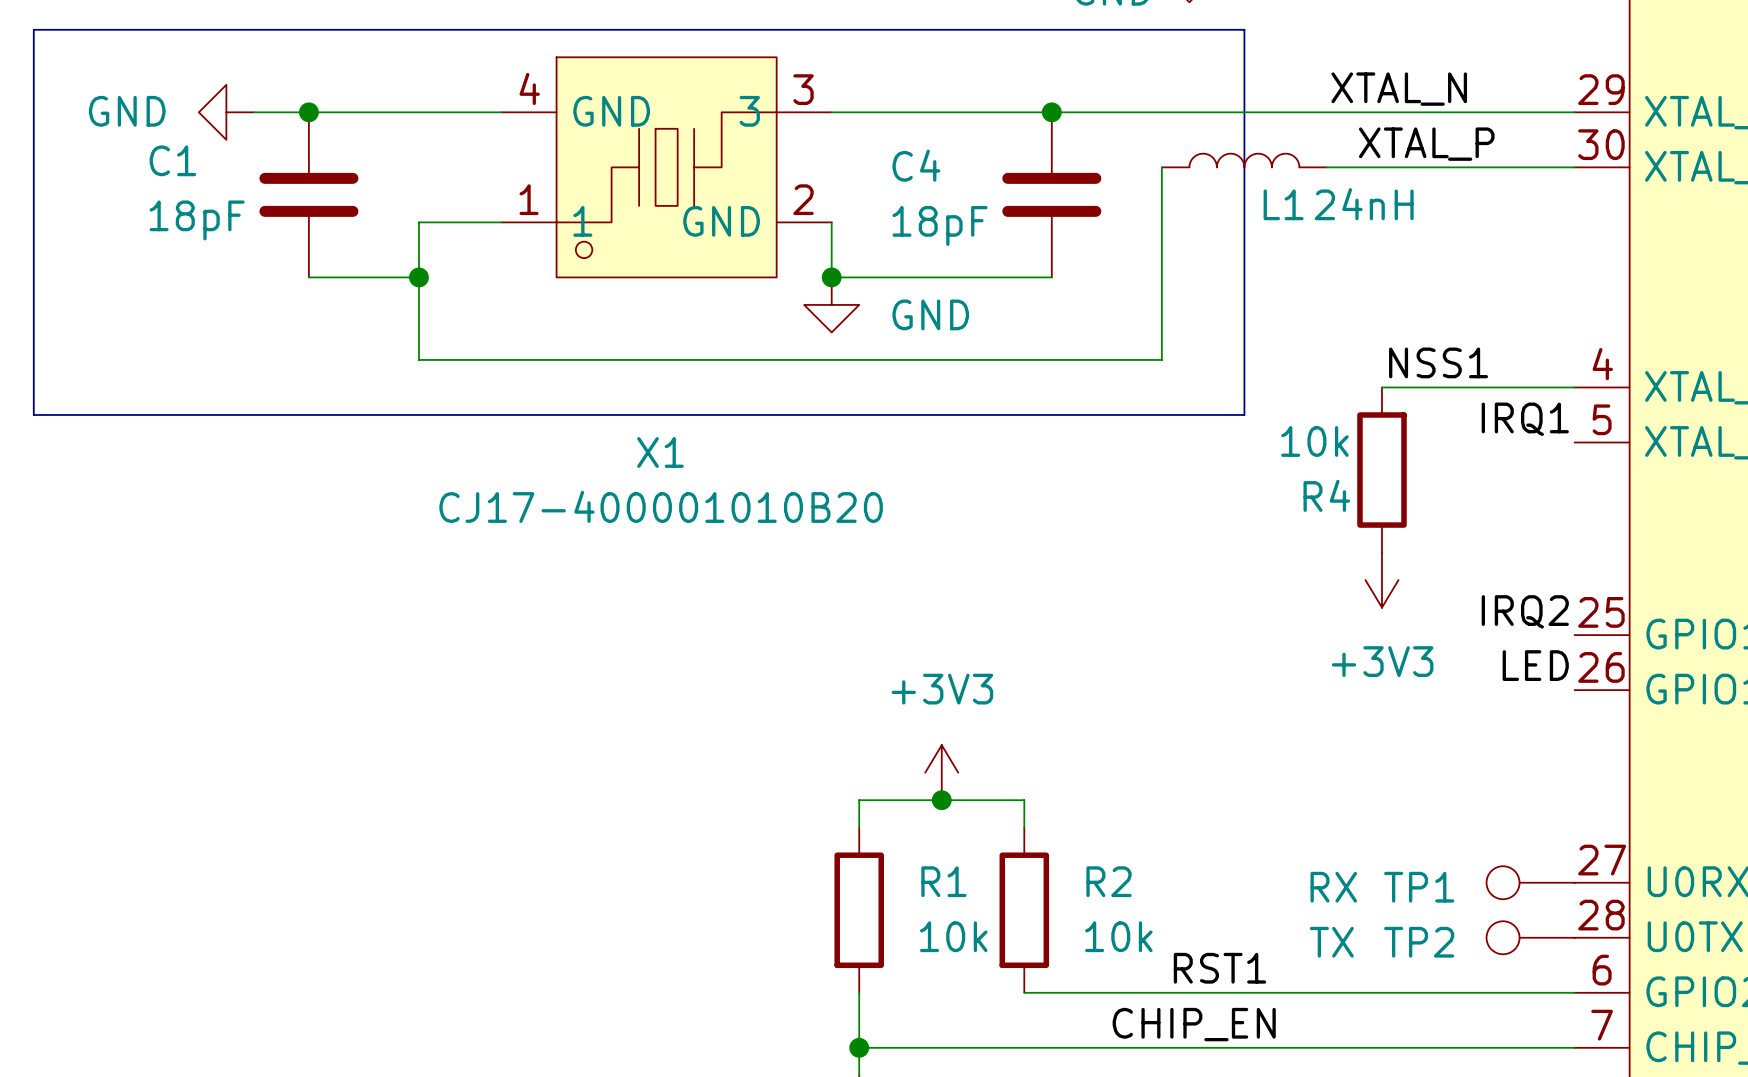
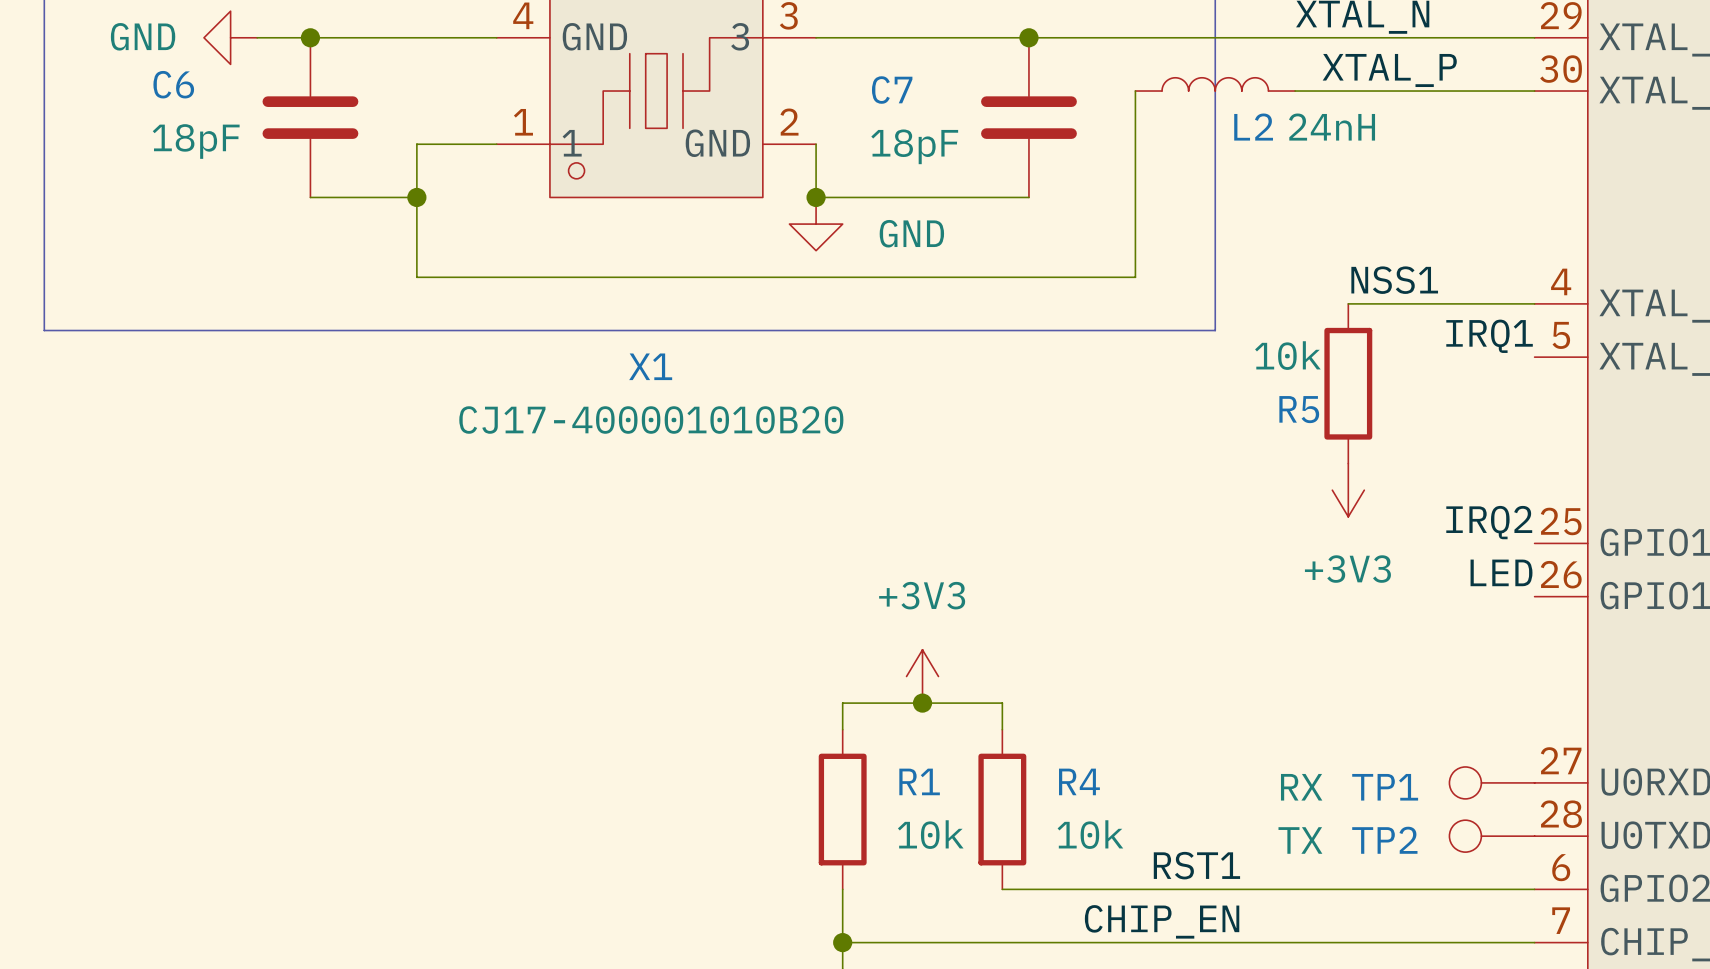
C1 name: C1 (172, 160) -> C6 (173, 84)
C4 name: C4 (916, 165) -> C7 (892, 90)
L1 name: L1 (1283, 204) -> L2 (1253, 127)
R4 name: R4 (1326, 495) -> R5 (1299, 409)
R2 name: R2 (1109, 881) -> R4 (1079, 781)

